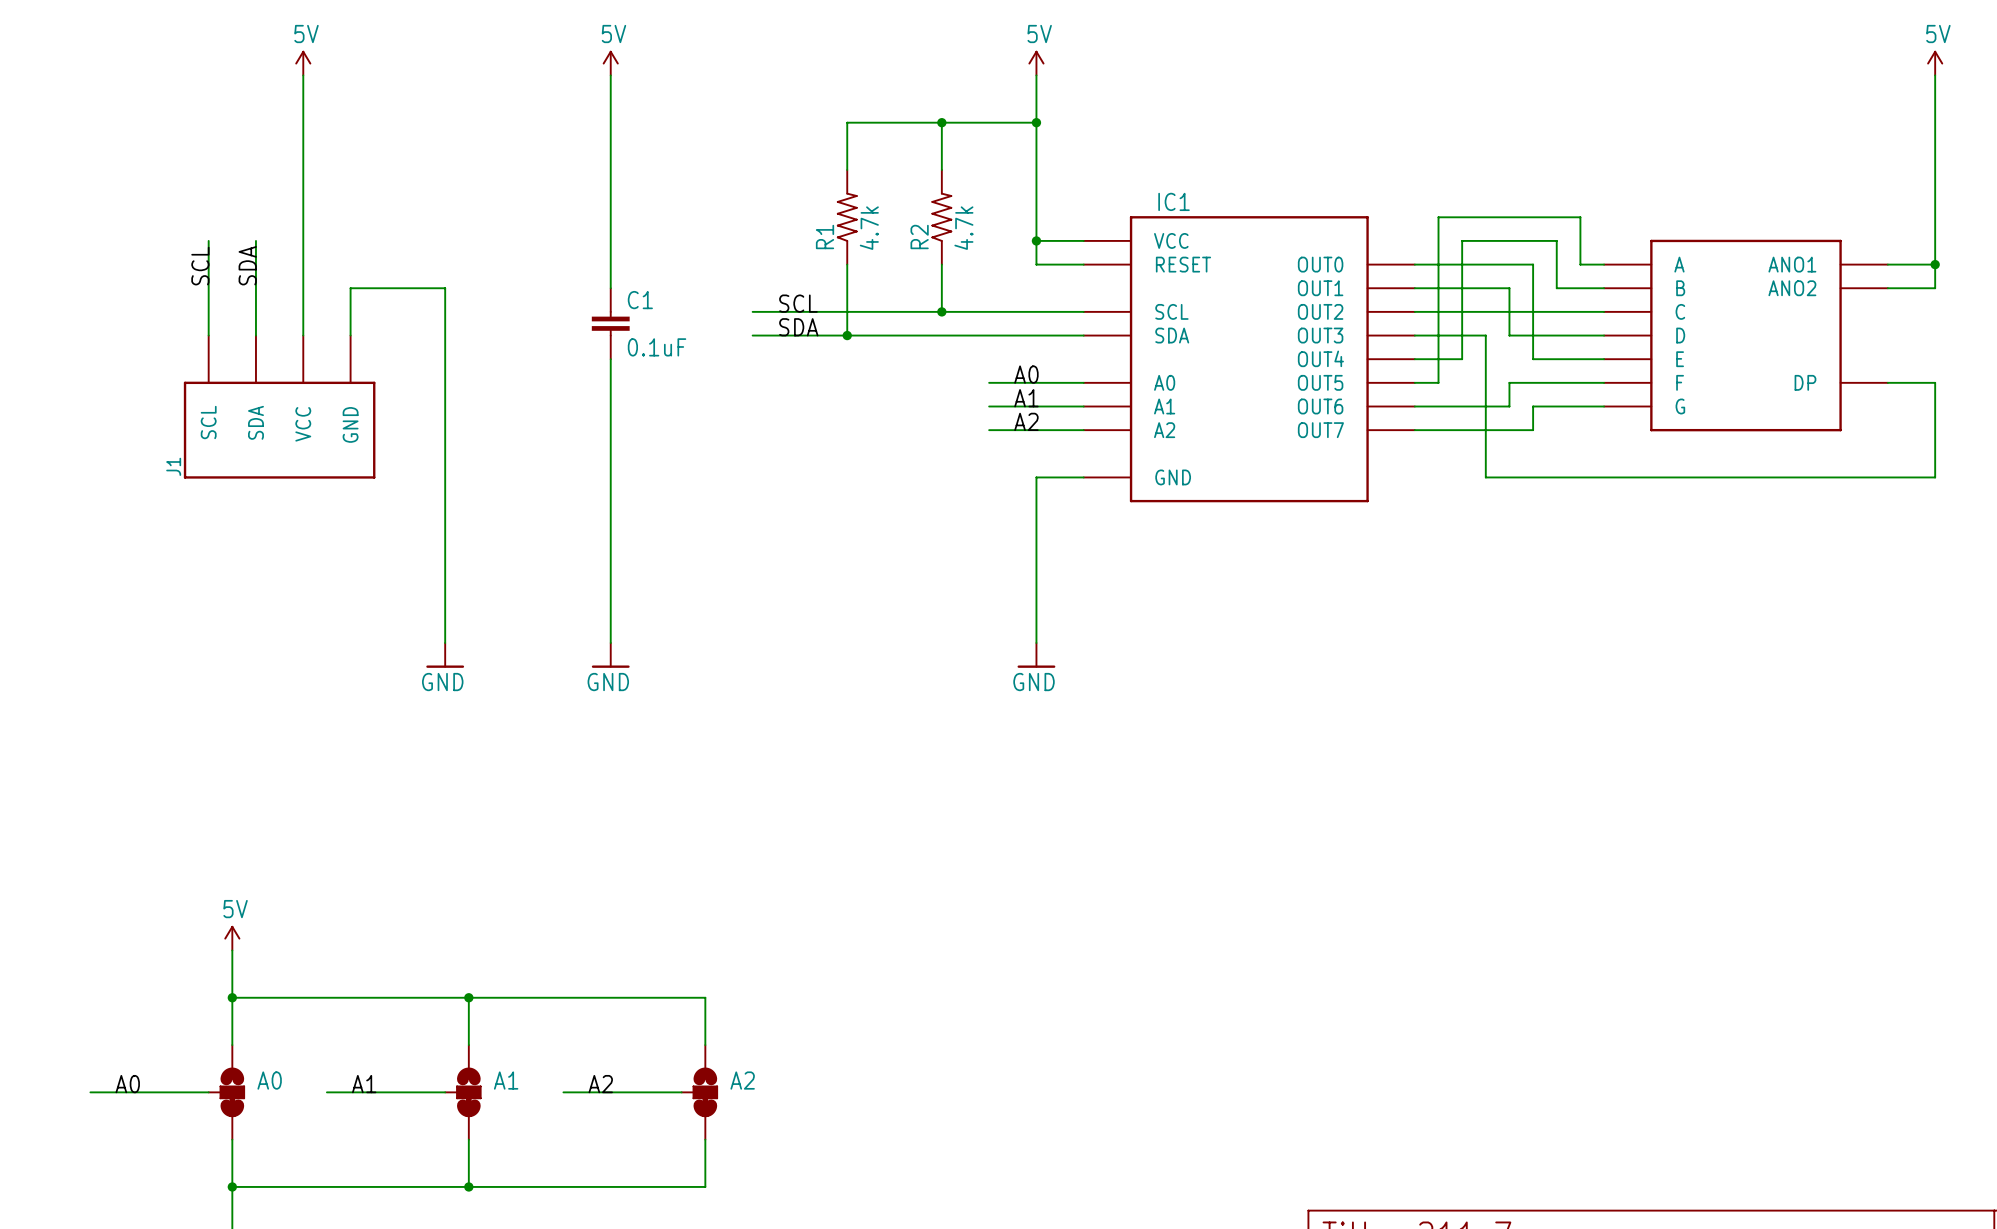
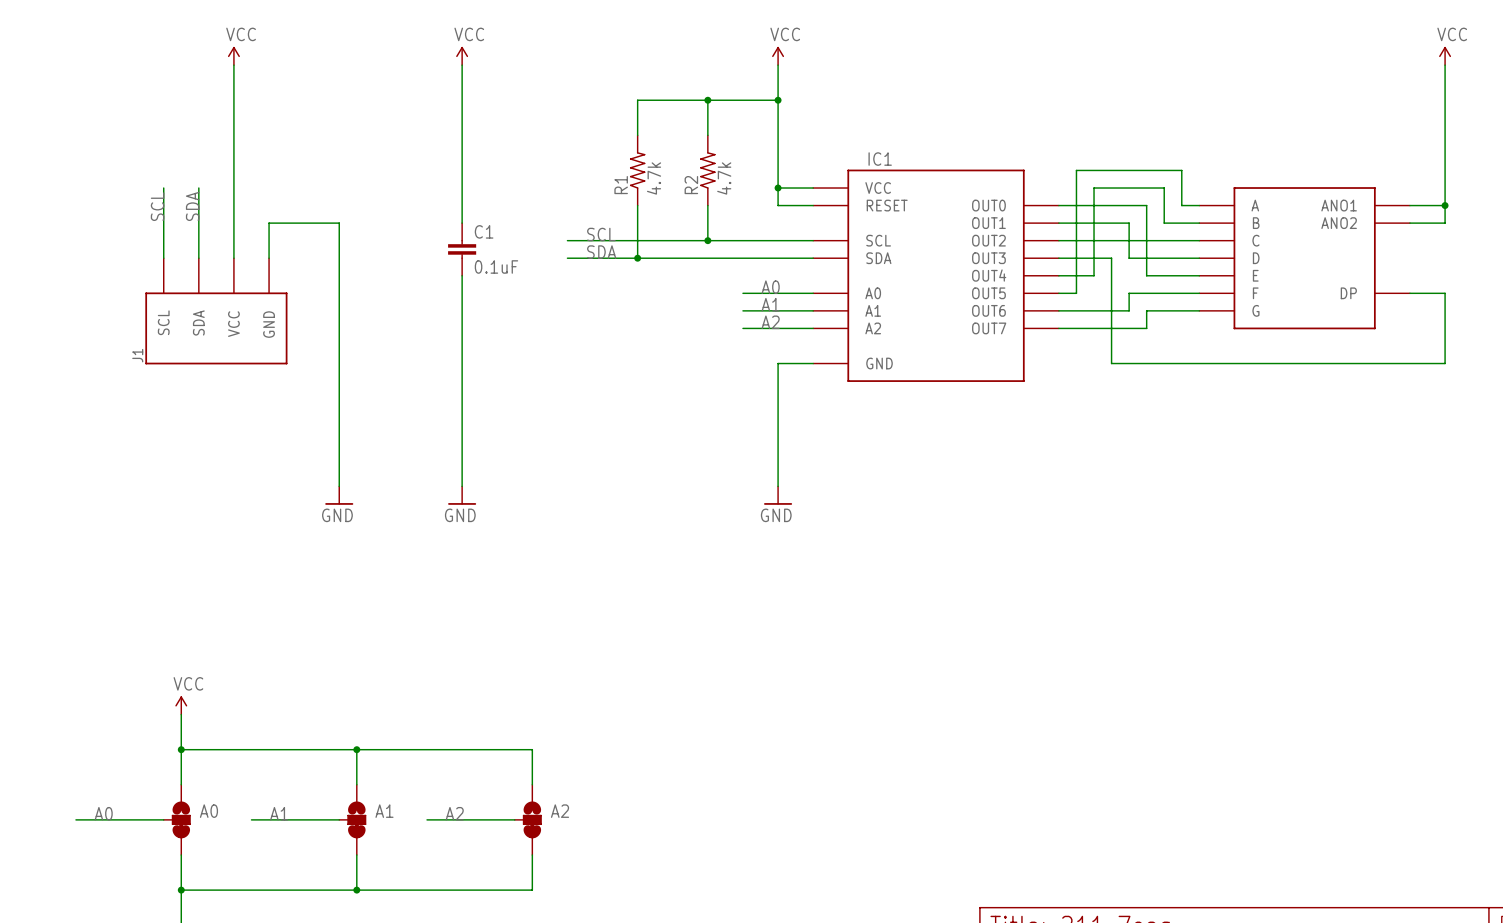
power symbol: 5V (303, 63) -> VCC (233, 56)
power symbol: 5V (610, 63) -> VCC (462, 56)
power symbol: 5V (1036, 63) -> VCC (778, 56)
power symbol: 5V (1935, 63) -> VCC (1445, 56)
power symbol: 5V (232, 938) -> VCC (181, 705)

